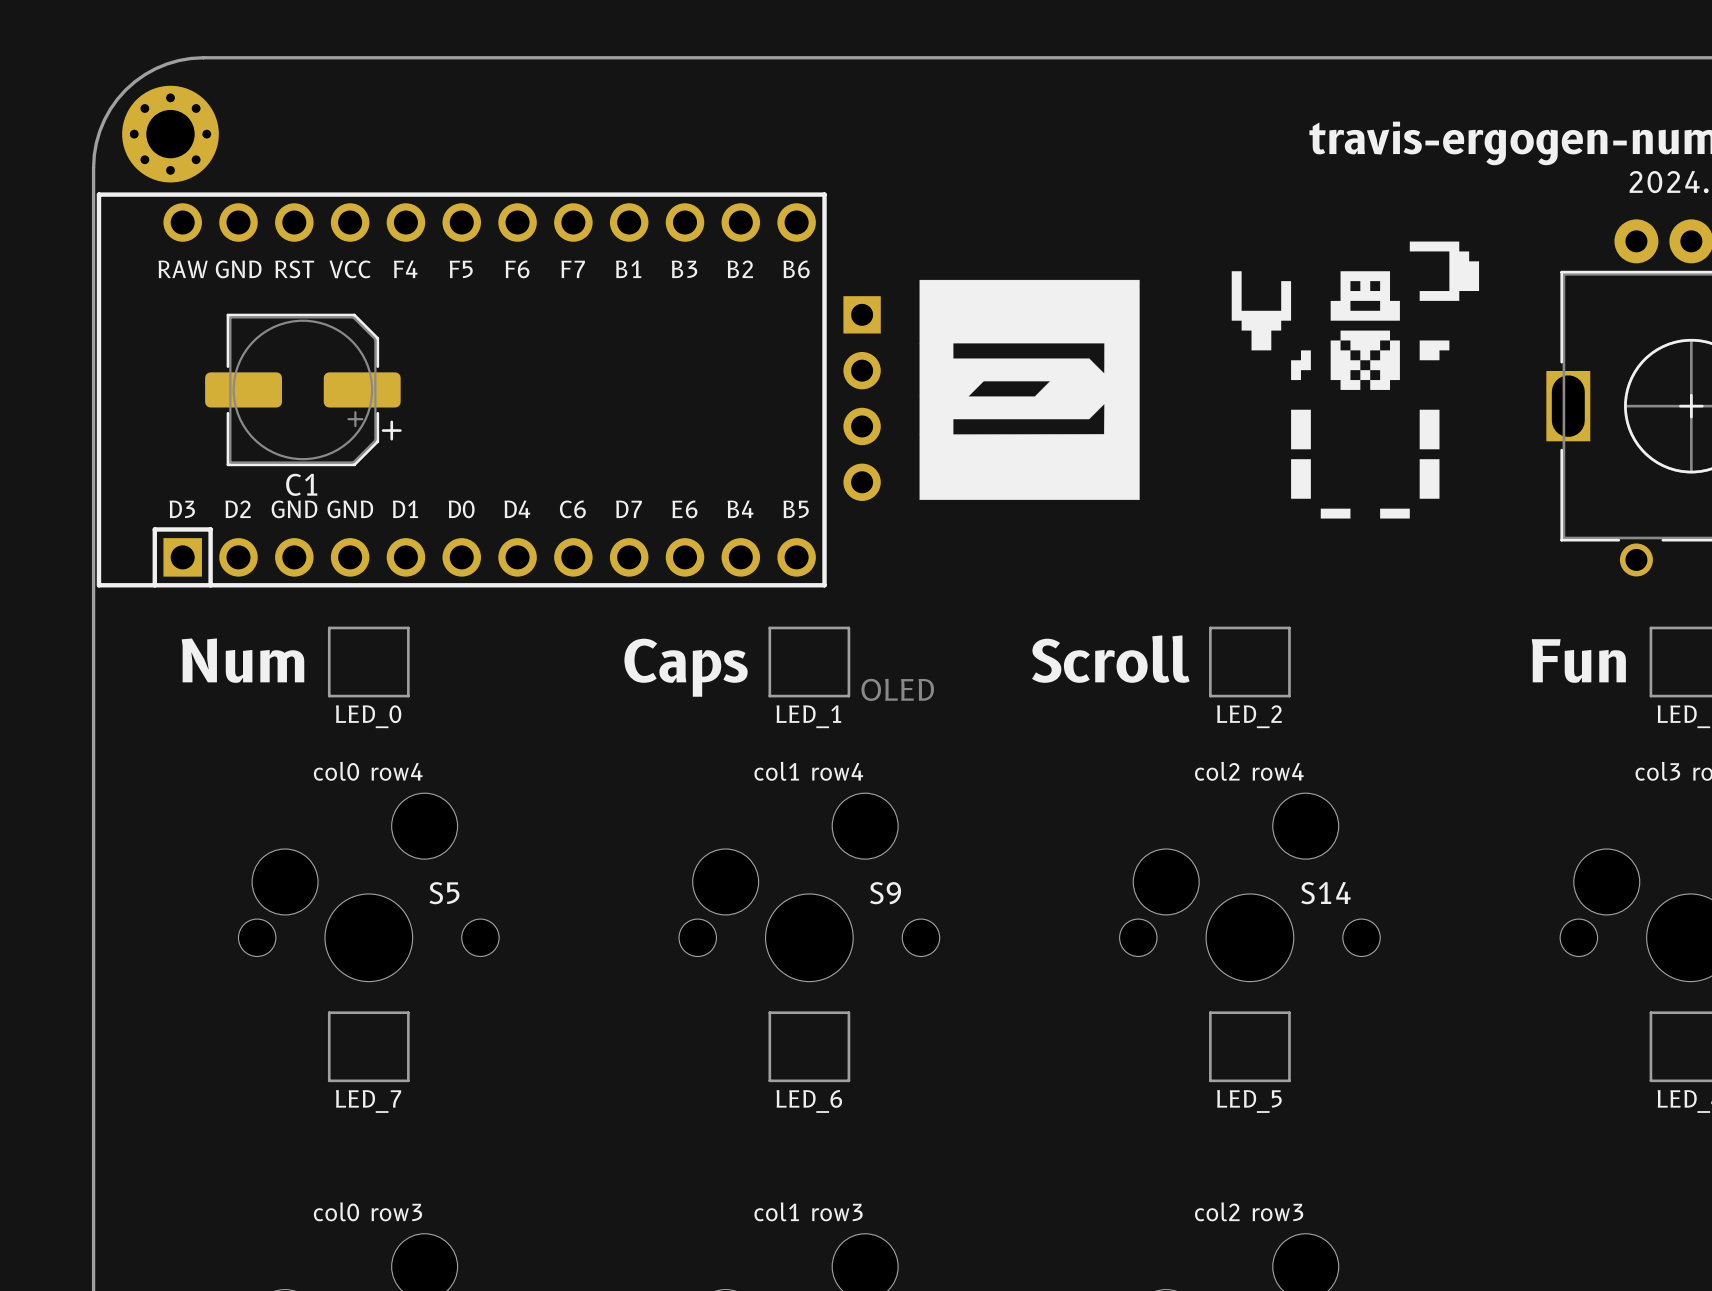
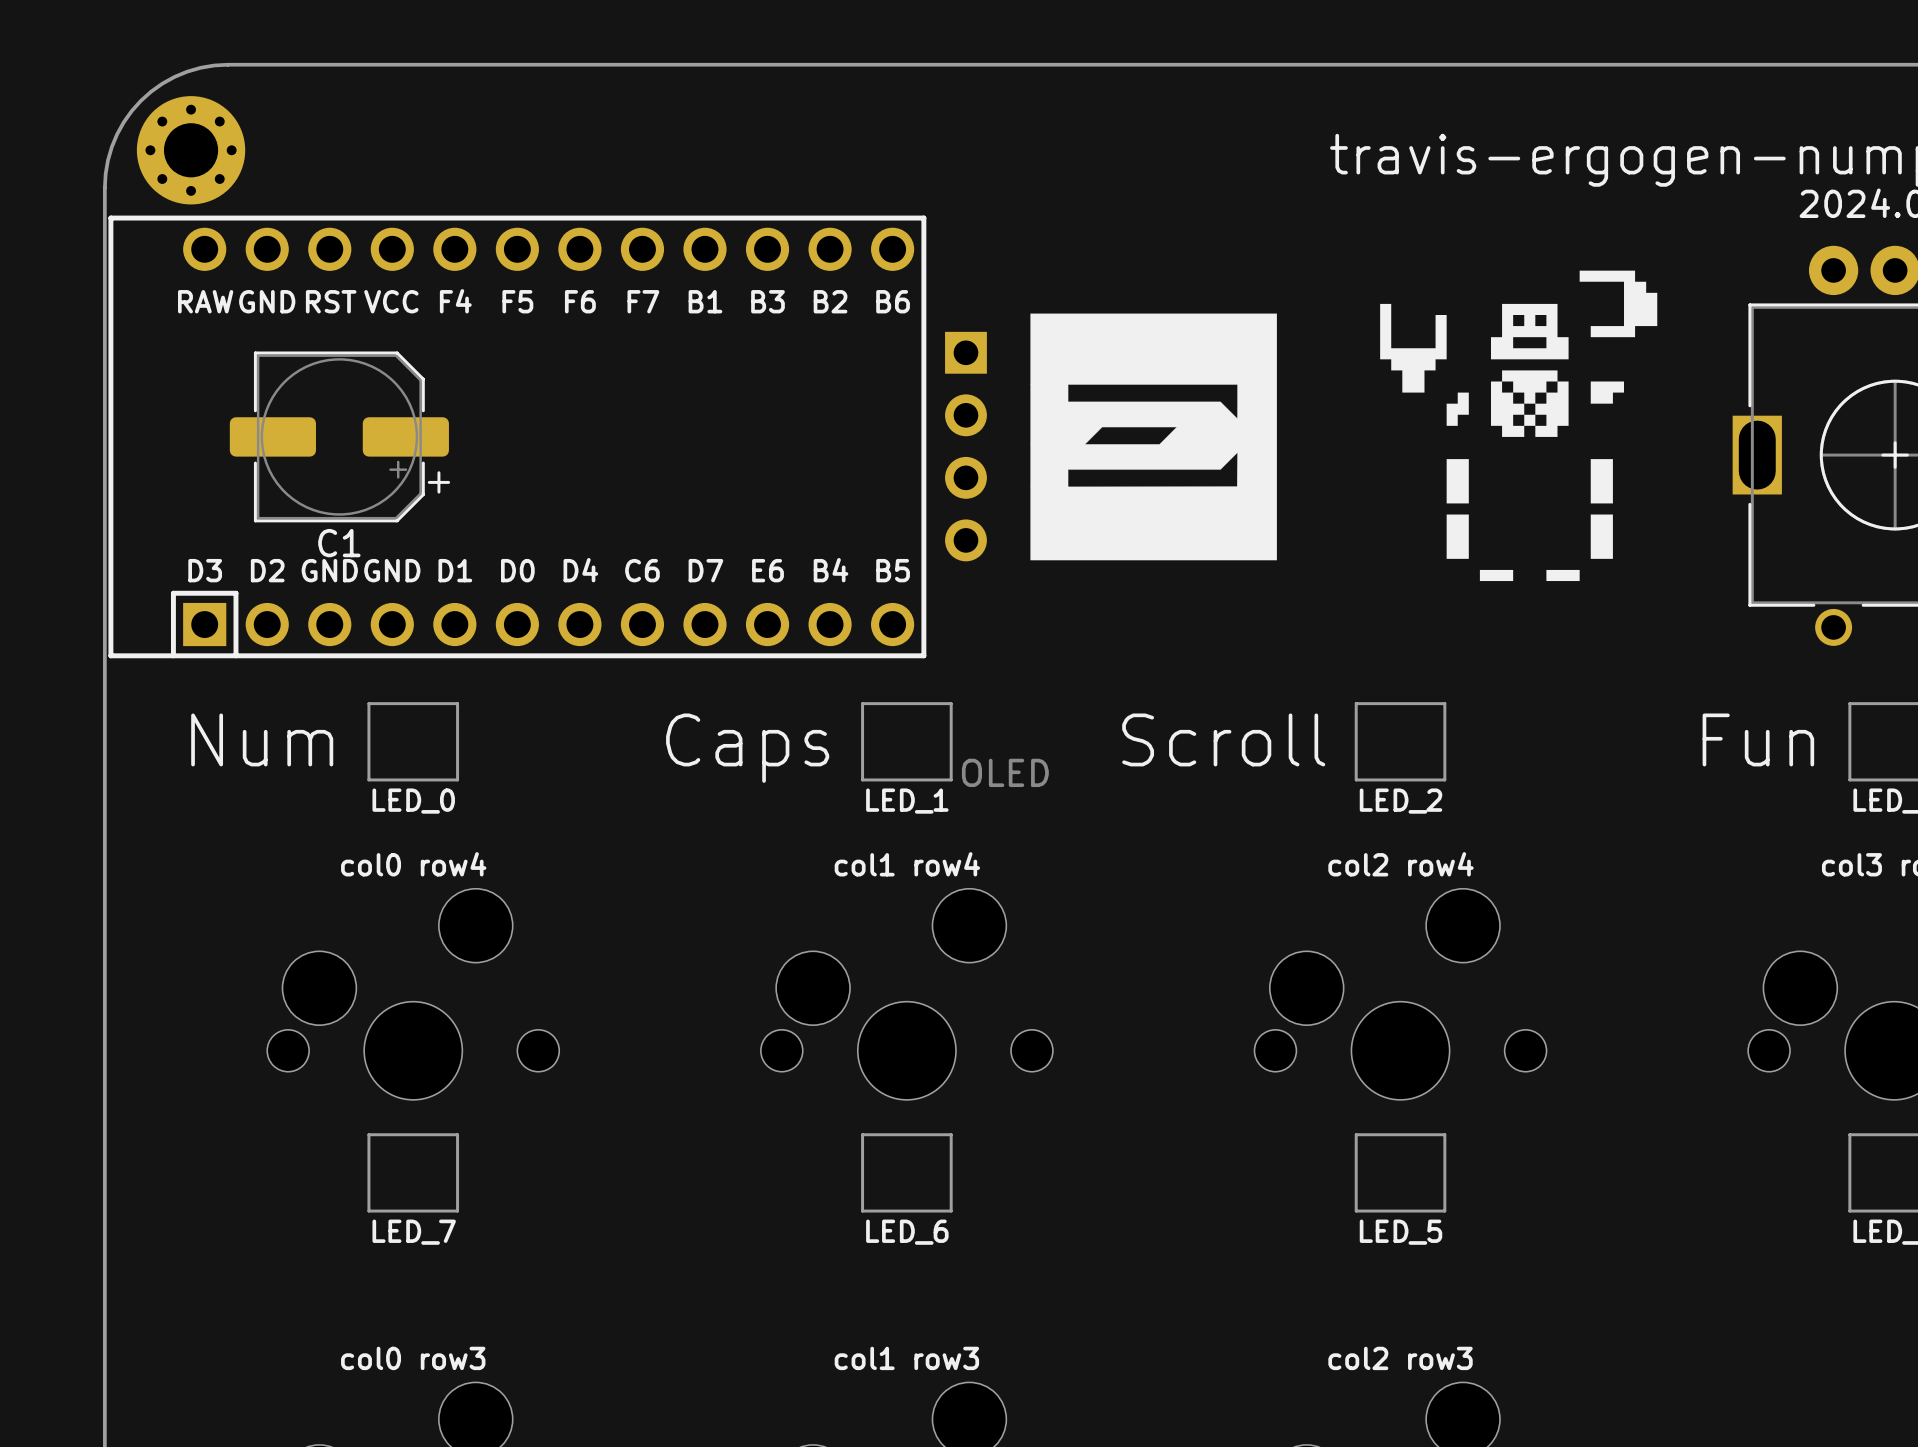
S5 name: S5 (444, 893) -> none
S9 name: S9 (885, 893) -> none
S14 name: S14 (1325, 893) -> none

